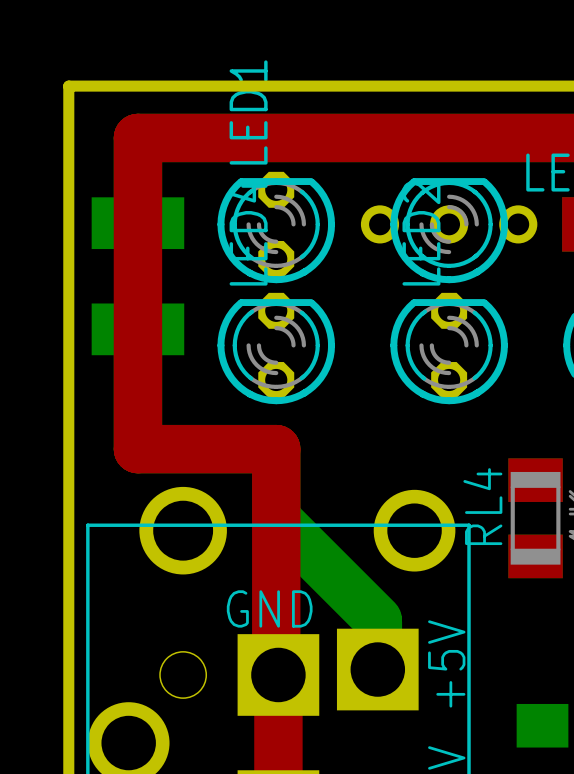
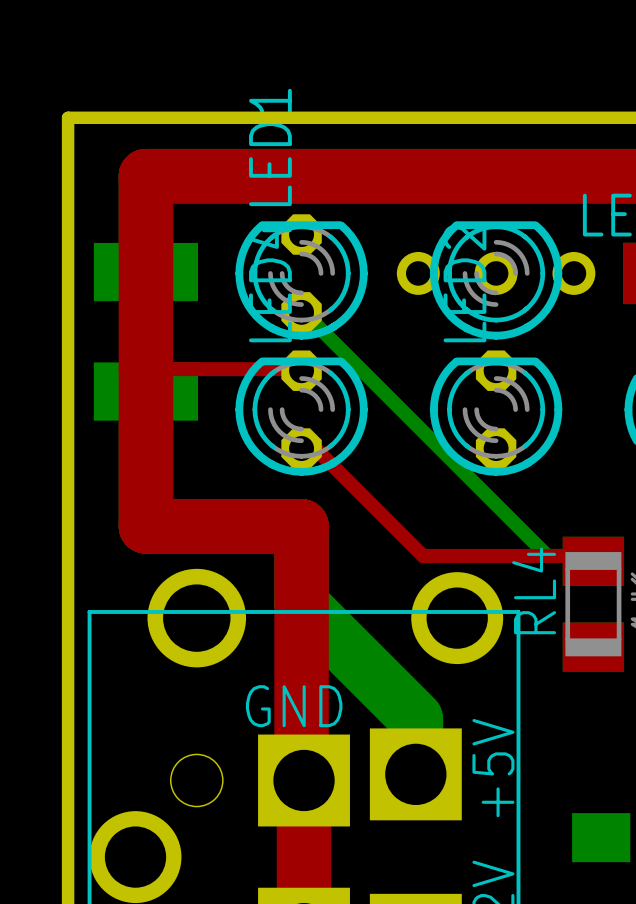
bottom track: none -> (301, 312) (304, 313) (547, 555) (591, 555) (593, 561)
top track: none -> (145, 369) (298, 369) (301, 370)
top track: none -> (301, 448) (317, 450) (422, 555) (591, 555) (593, 561)

